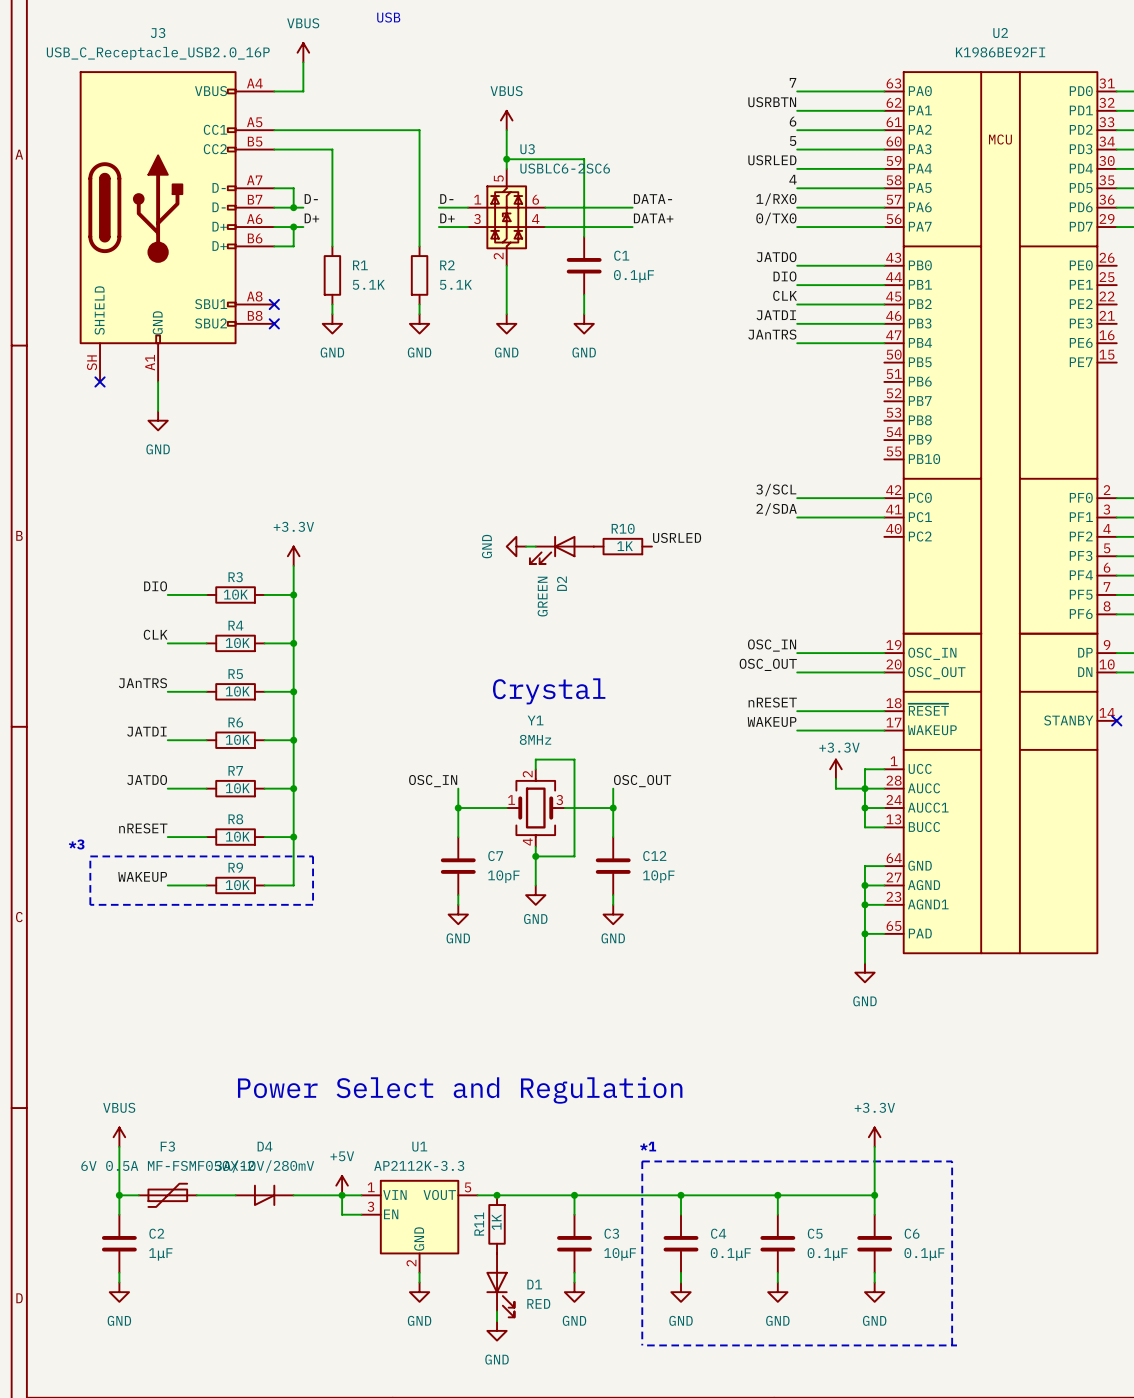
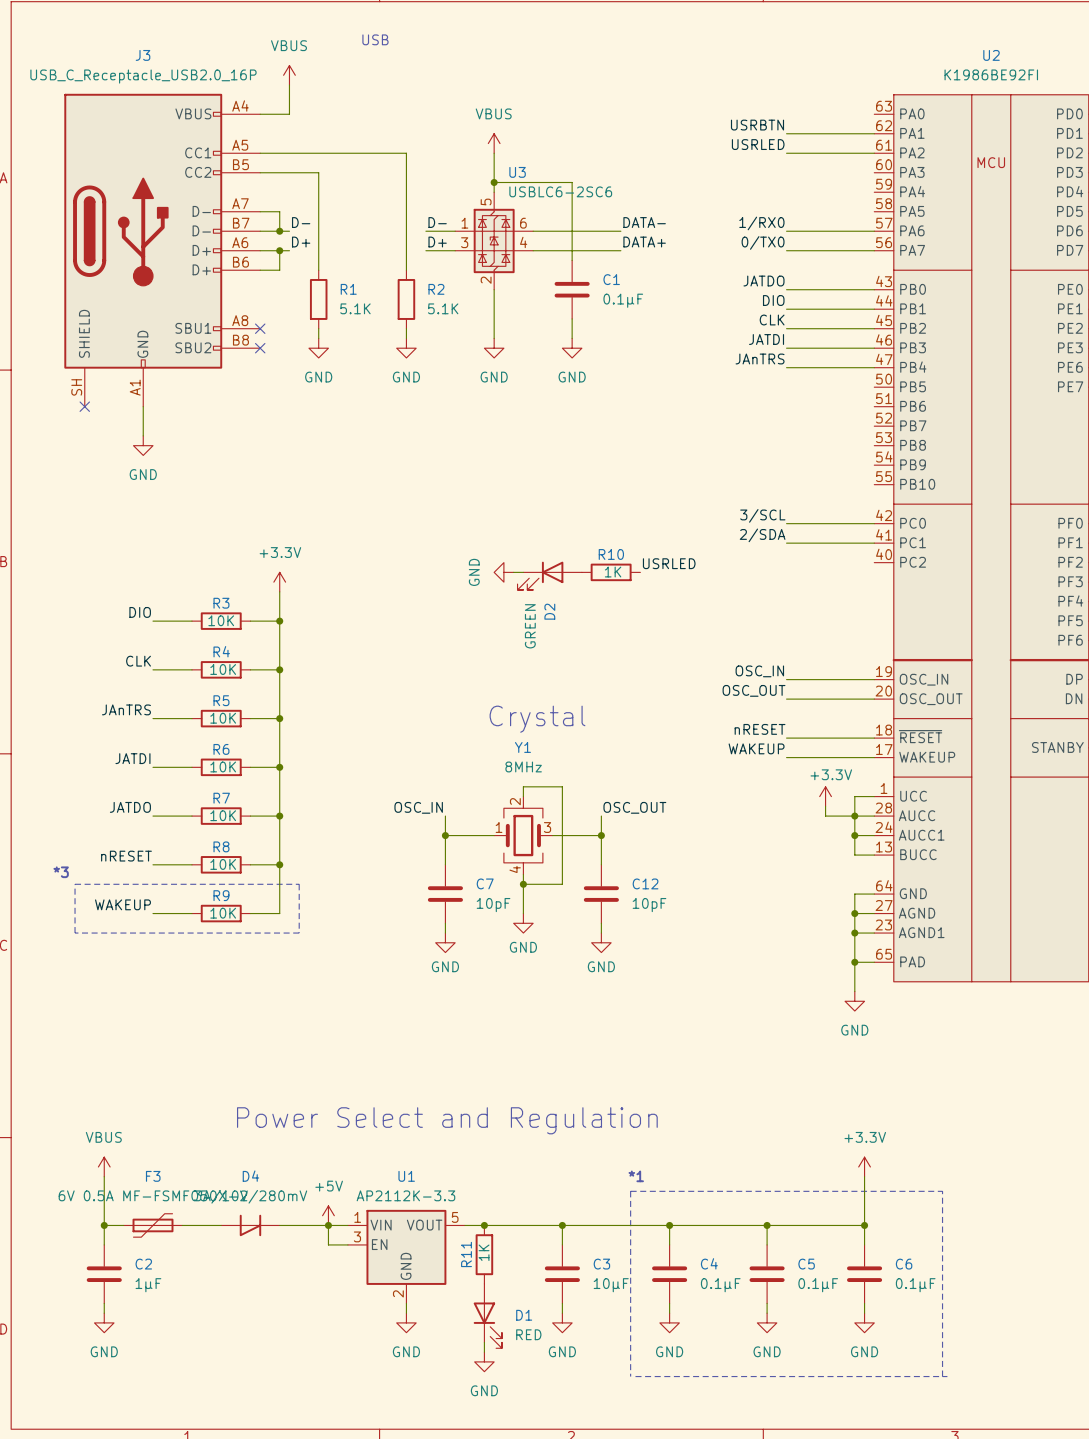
label: 7 (793, 82) -> none
wire: (797, 91) (884, 91) -> none
label: 6 (793, 121) -> USRLED (758, 144)
label: 5 (793, 141) -> none
wire: (797, 149) (884, 149) -> none
label: USRLED (772, 160) -> none
wire: (797, 168) (884, 168) -> none
label: 4 (793, 179) -> none
wire: (797, 188) (884, 188) -> none

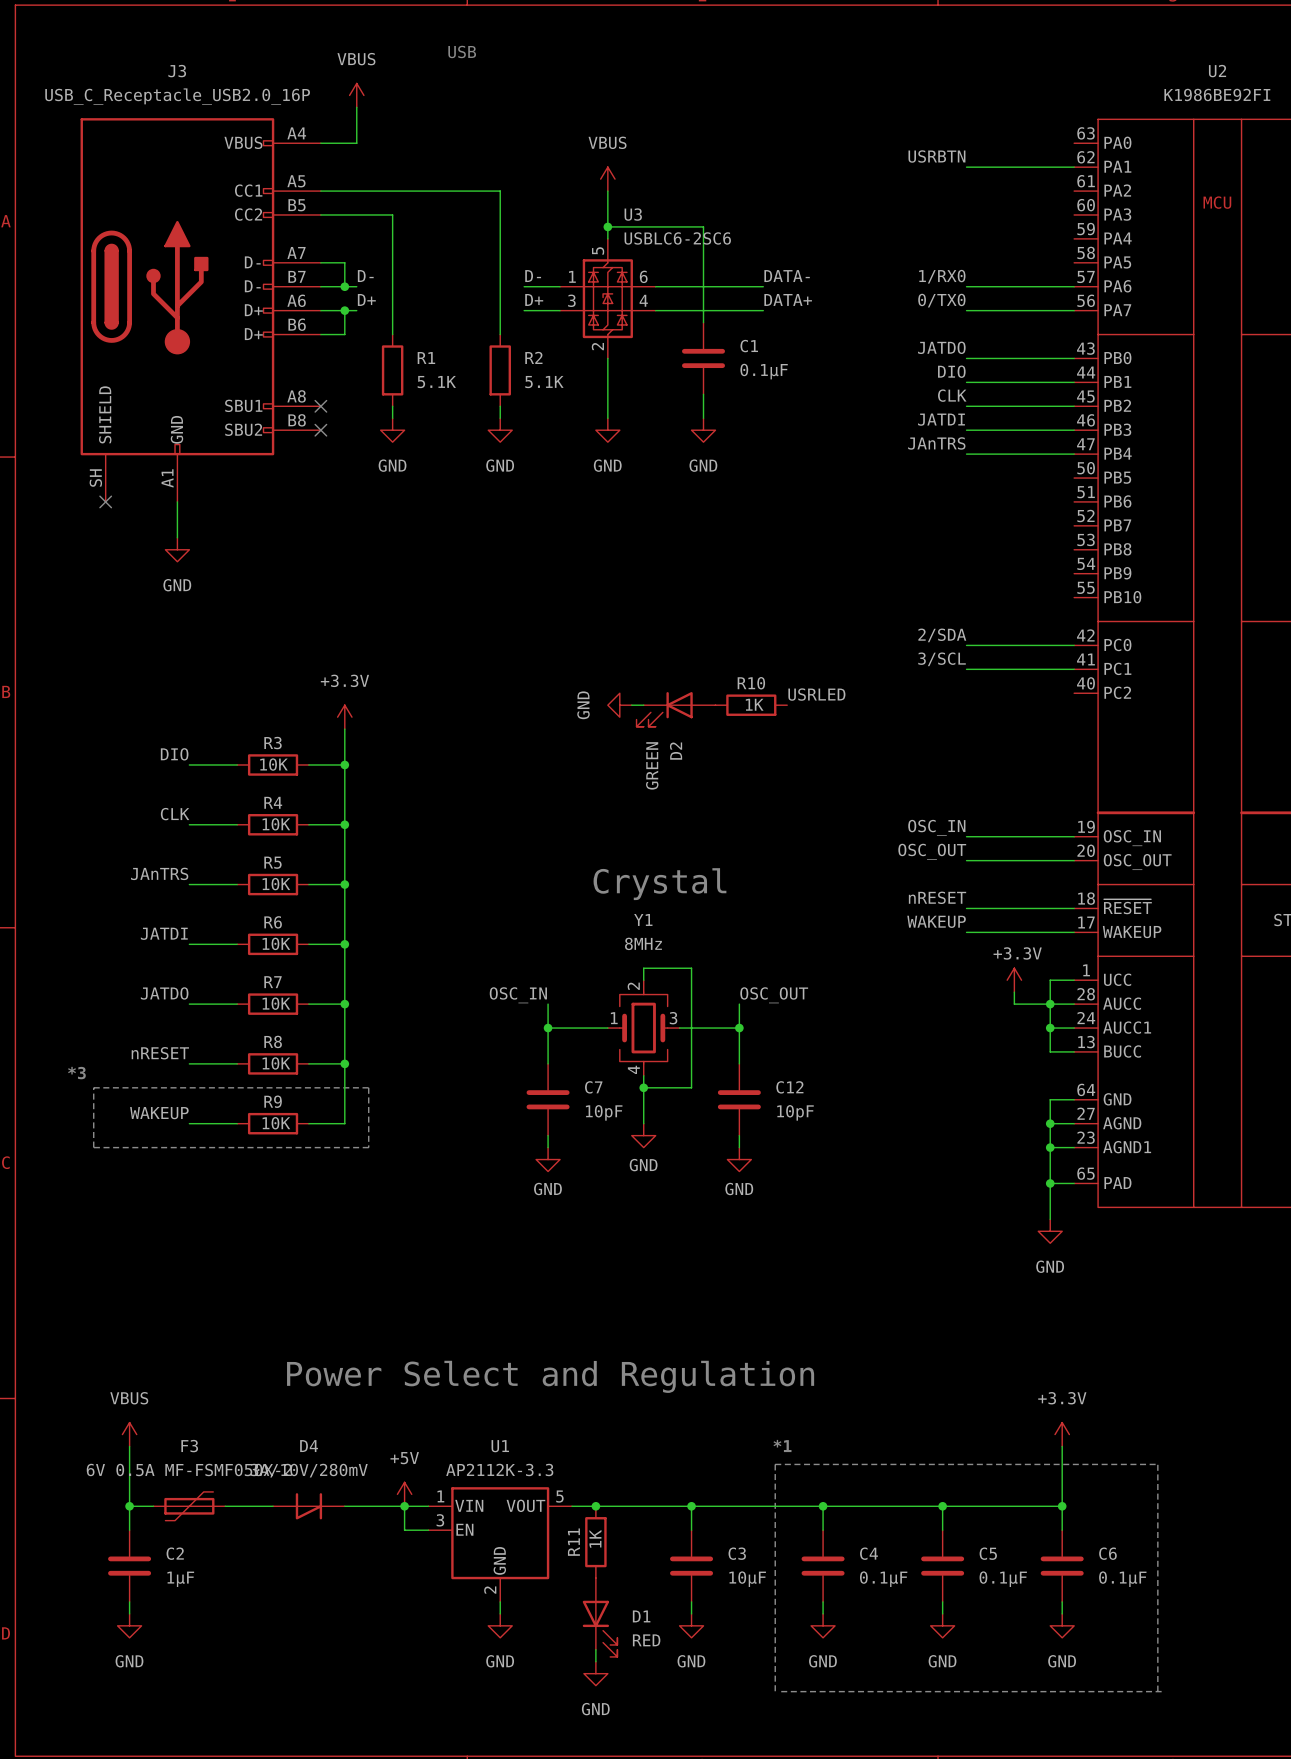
label: USRLED (758, 144) -> none
wire: (786, 153) (874, 153) -> none
label: 3/SCL (762, 515) -> 2/SDA (942, 635)
label: 2/SDA (762, 535) -> 3/SCL (942, 659)

